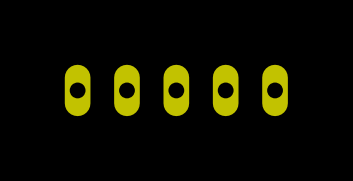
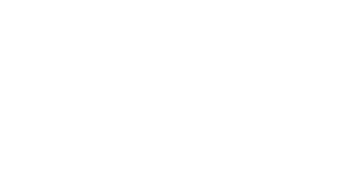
part: (176, 90) -> none

